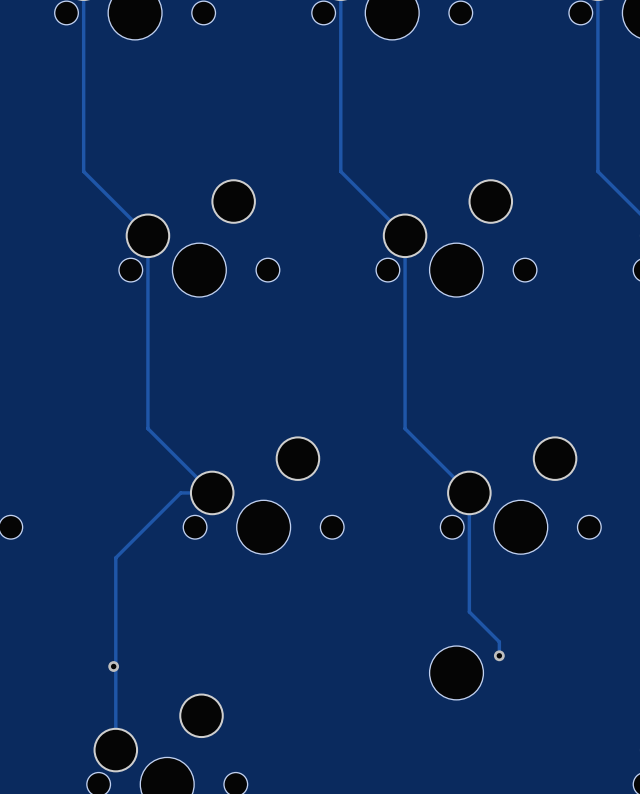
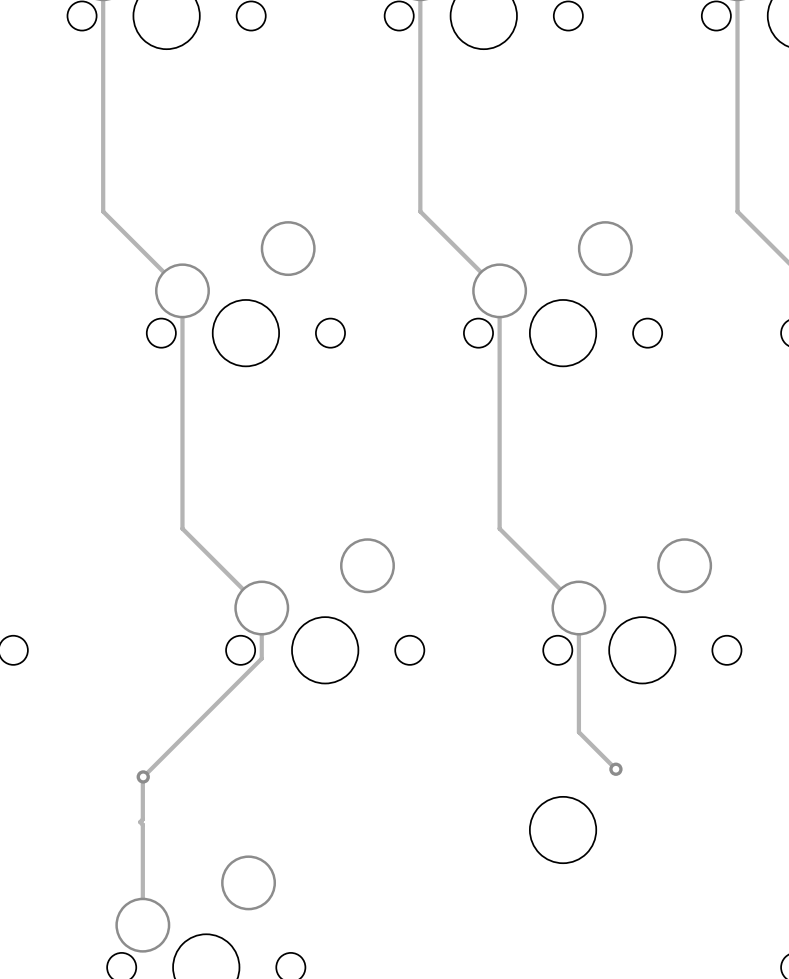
track: (212, 492) (180, 492) (115, 557) (115, 630) -> (261, 608) (261, 658) (143, 776)
track: (469, 593) (469, 611) (499, 641) (499, 655) -> (578, 732) (615, 769)
via position: (499, 655) -> (615, 769)
via position: (113, 666) -> (143, 776)

